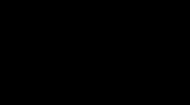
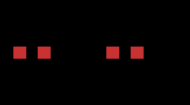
part: none -> (31, 52)
part: none -> (124, 52)

